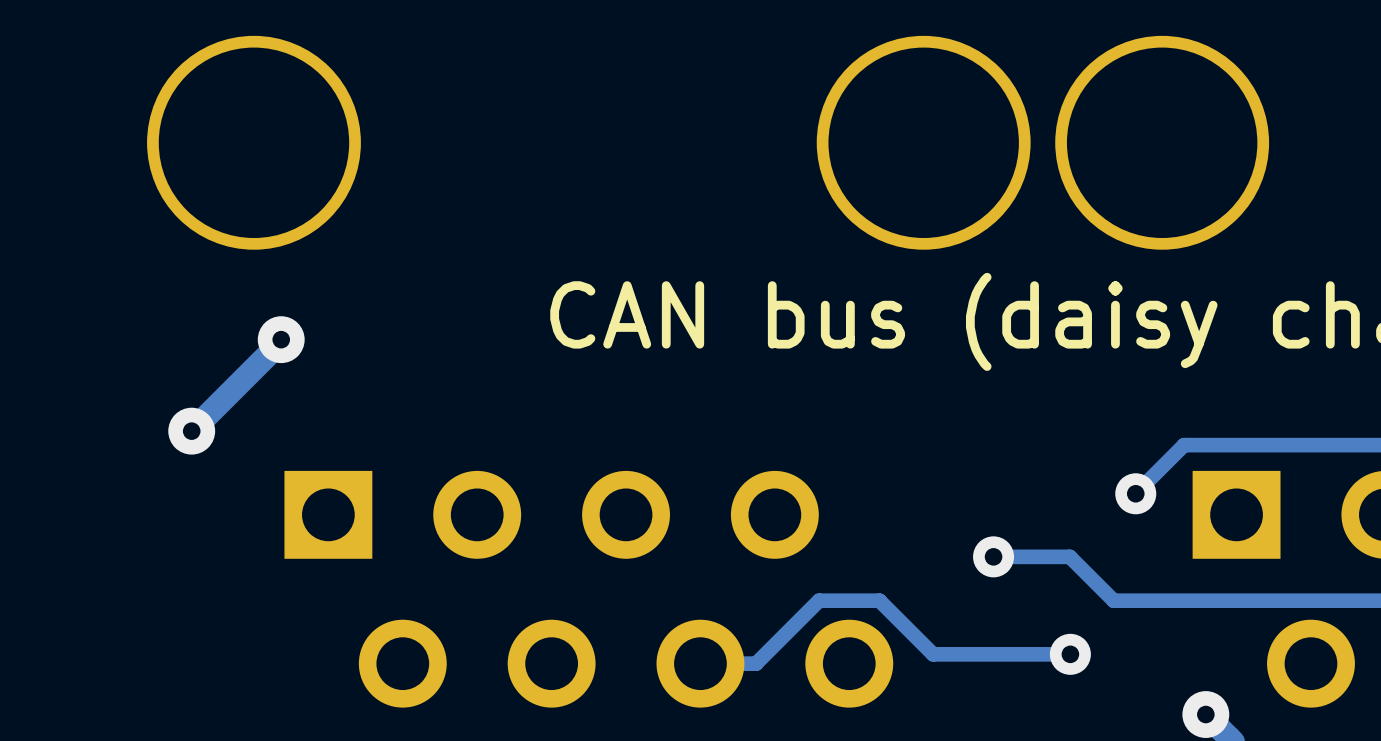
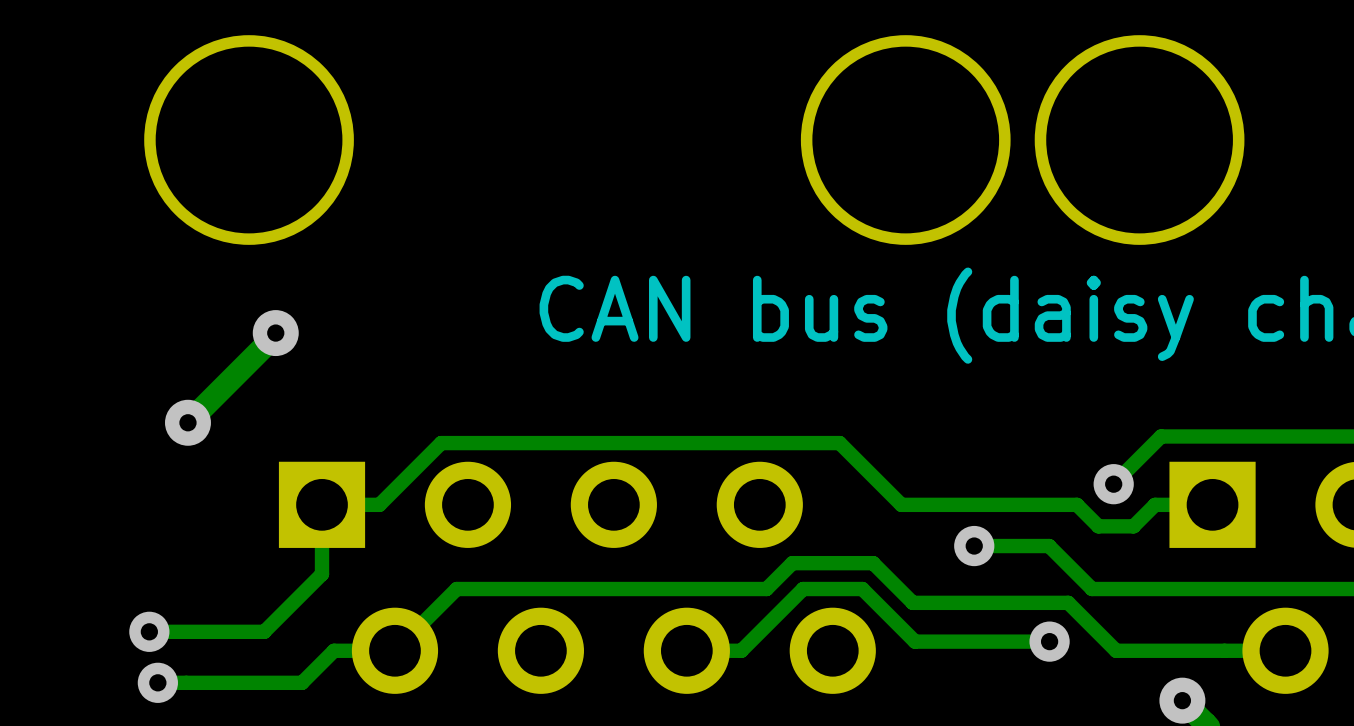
track: none -> (1212, 504) (1155, 504) (1133, 526) (1098, 526) (1076, 504) (901, 504) (839, 443) (441, 443) (379, 504) (322, 504) (322, 574) (264, 631) (149, 631)
via: none -> (149, 631)
track: none -> (1285, 650) (1116, 650) (1068, 602) (912, 602) (873, 563) (792, 563) (766, 589) (456, 589) (394, 650) (334, 650) (301, 682) (157, 682)
via: none -> (157, 682)

